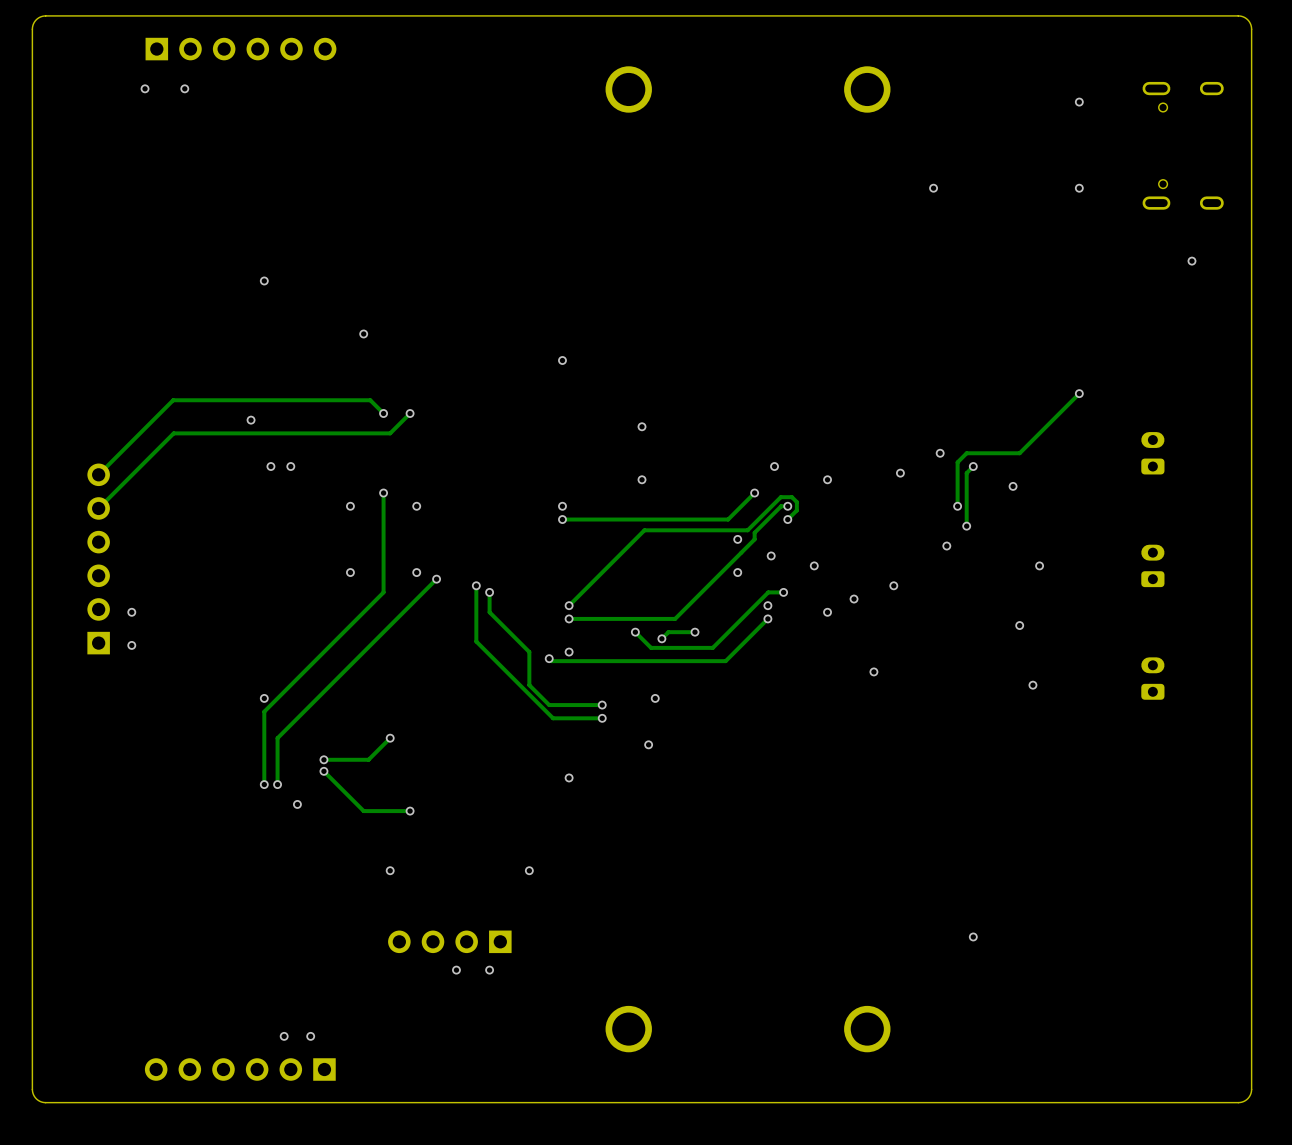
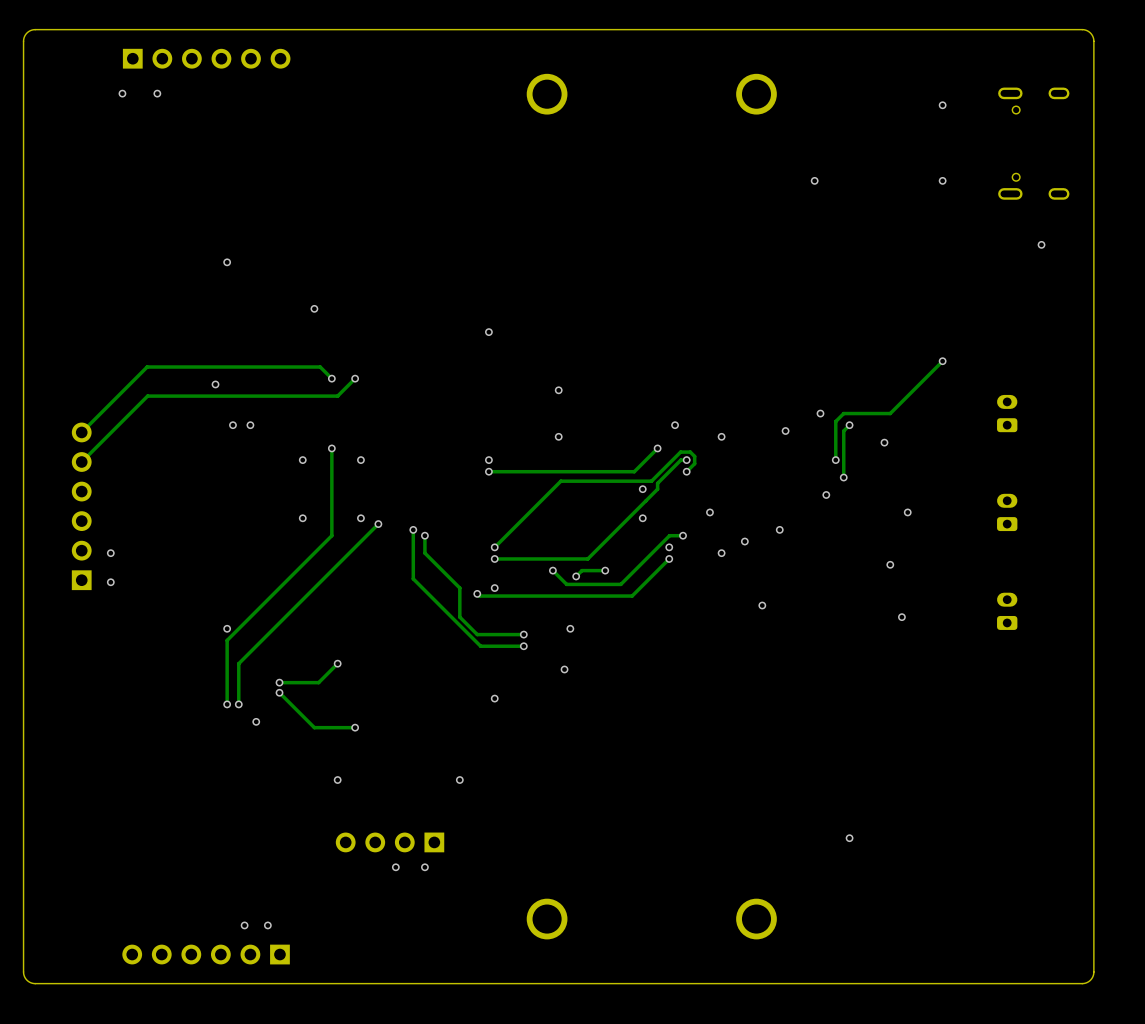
via: (771, 555) -> none

